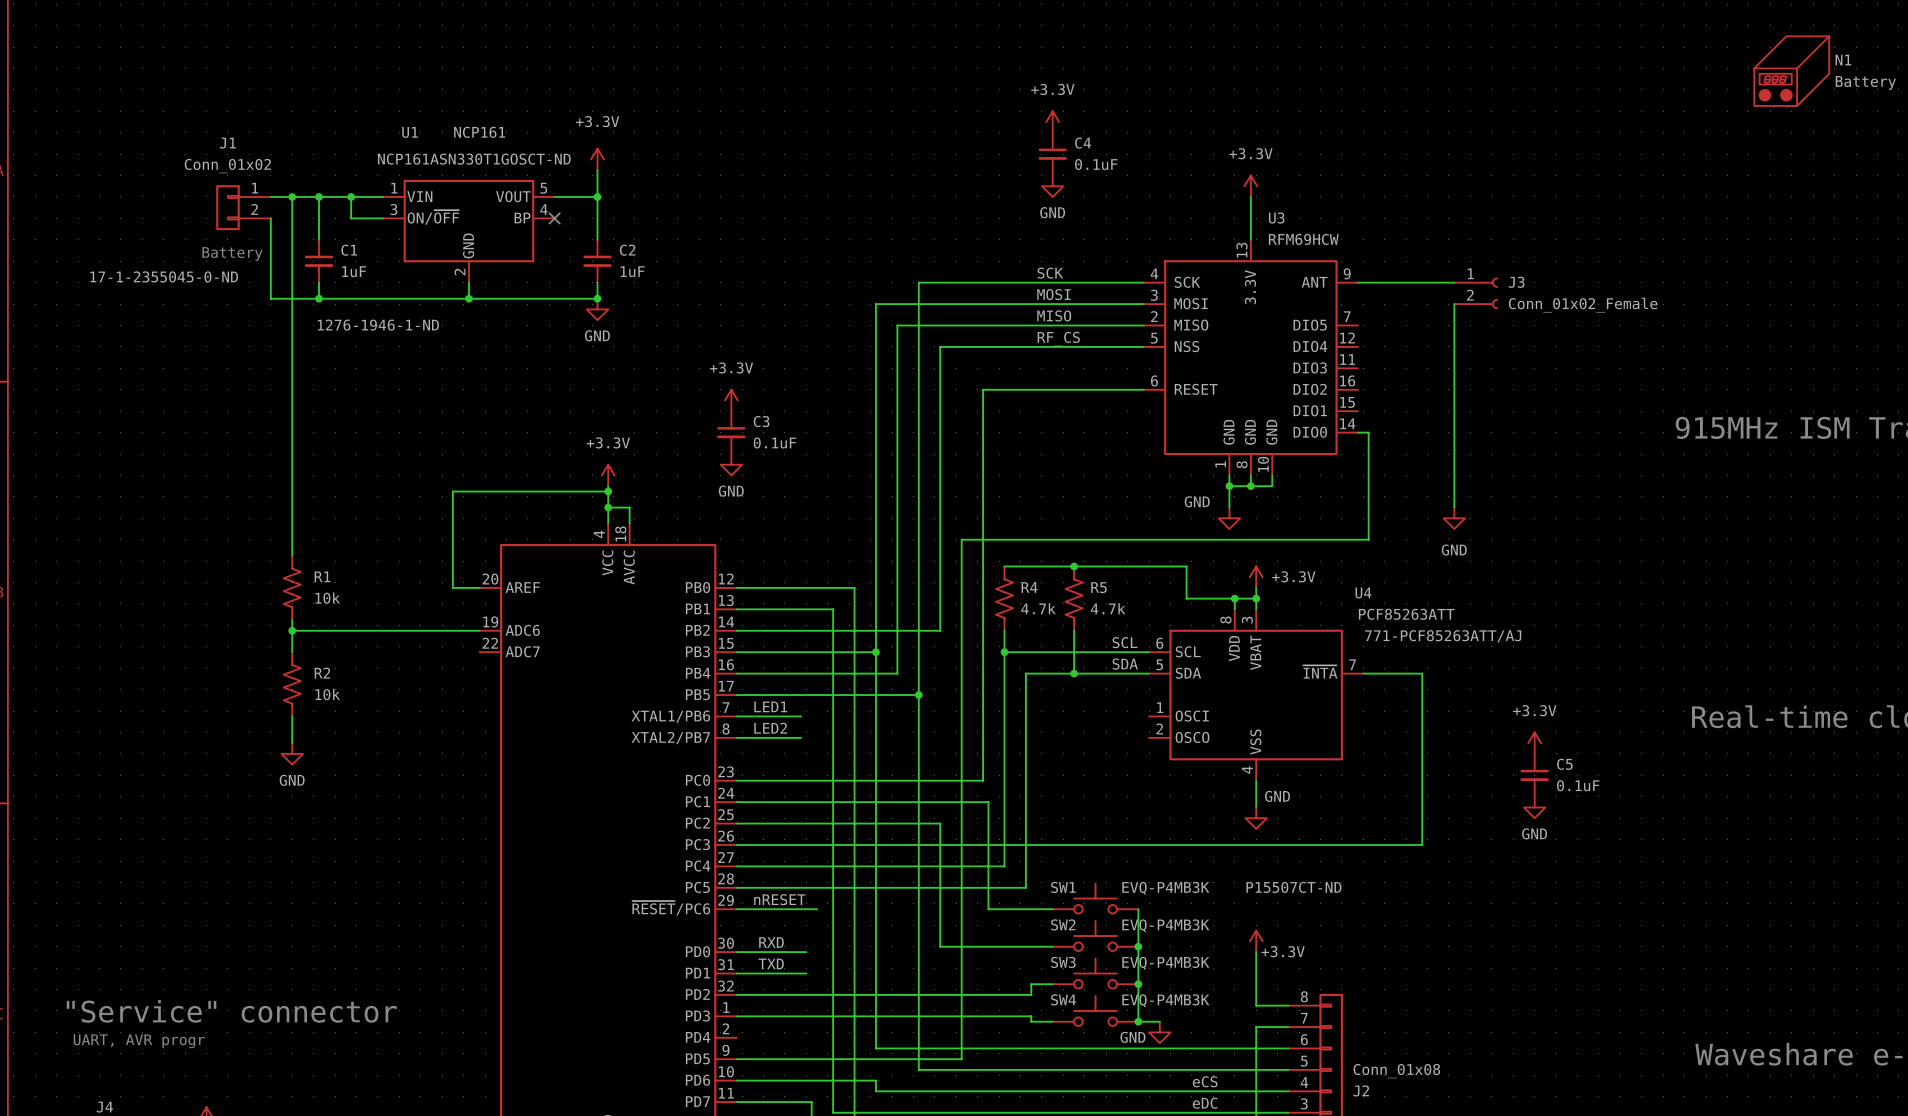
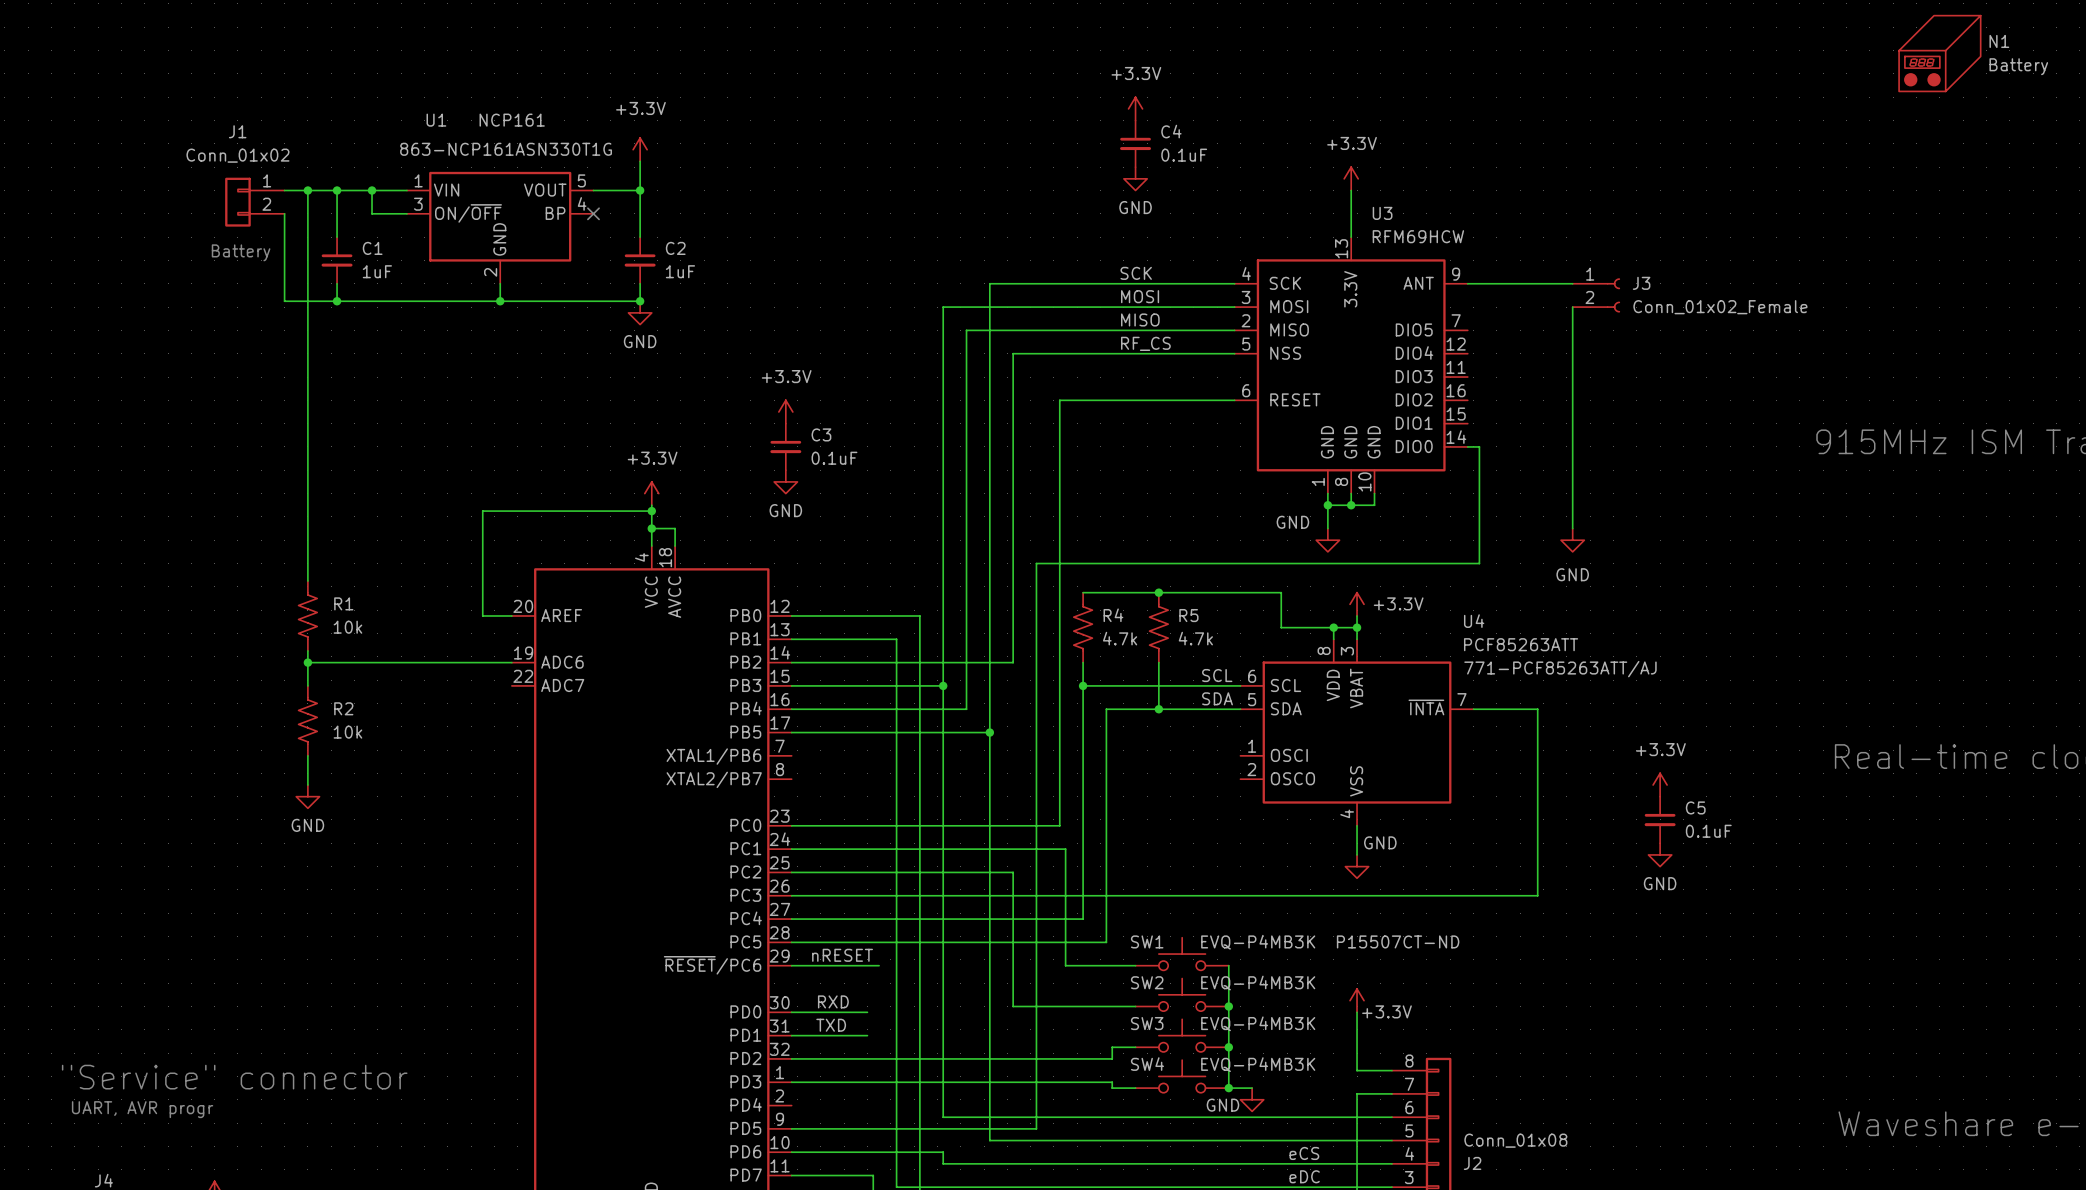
U1 text: NCP161ASN330T1GOSCT-ND (474, 159) -> 863-NCP161ASN330T1G (506, 149)
J1 text: 17-1-2355045-0-ND (164, 276) -> none
C1 text: 1276-1946-1-ND (378, 325) -> none
label: LED1 (770, 706) -> none
wire: (736, 716) (801, 716) -> none
label: LED2 (770, 728) -> none
wire: (736, 737) (801, 737) -> none

